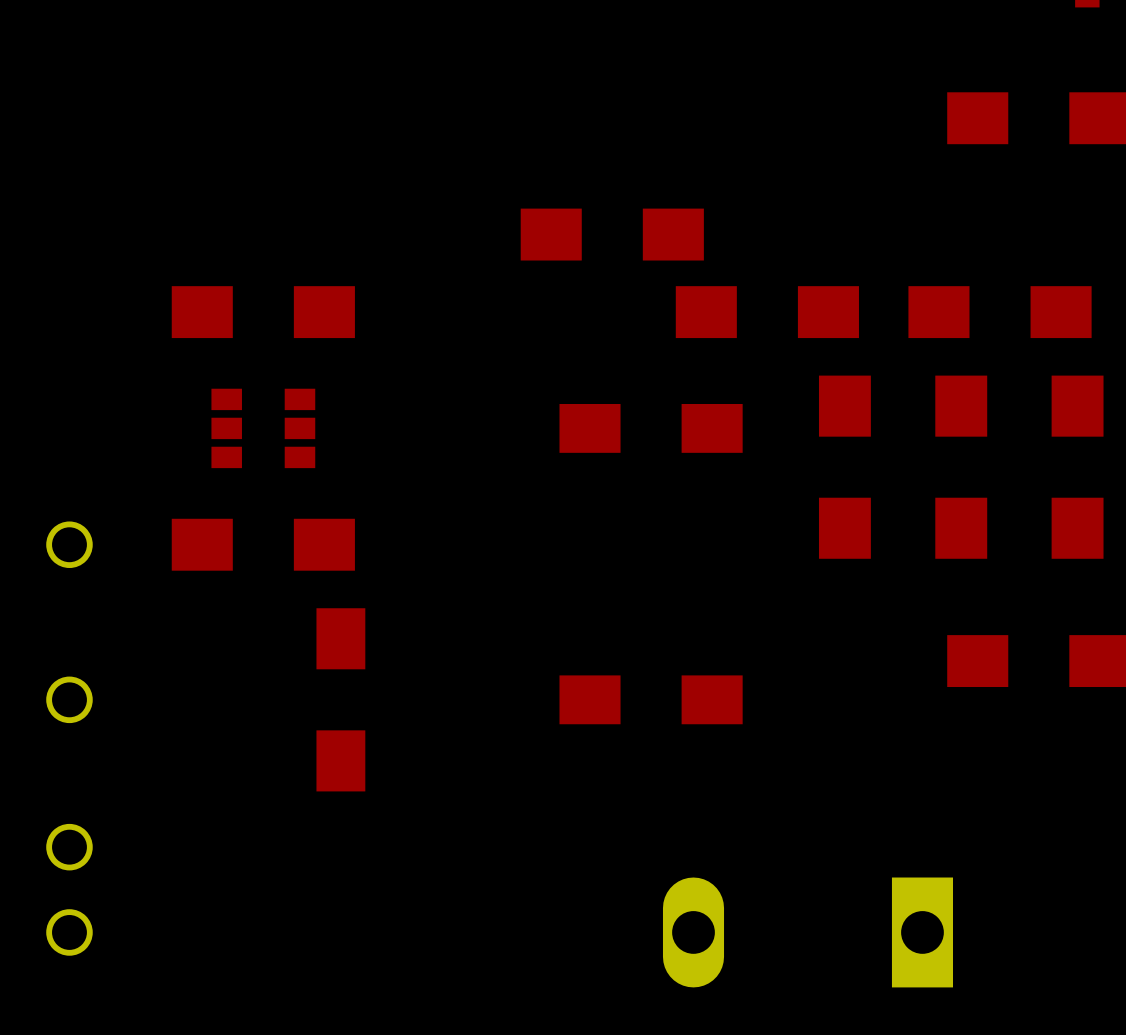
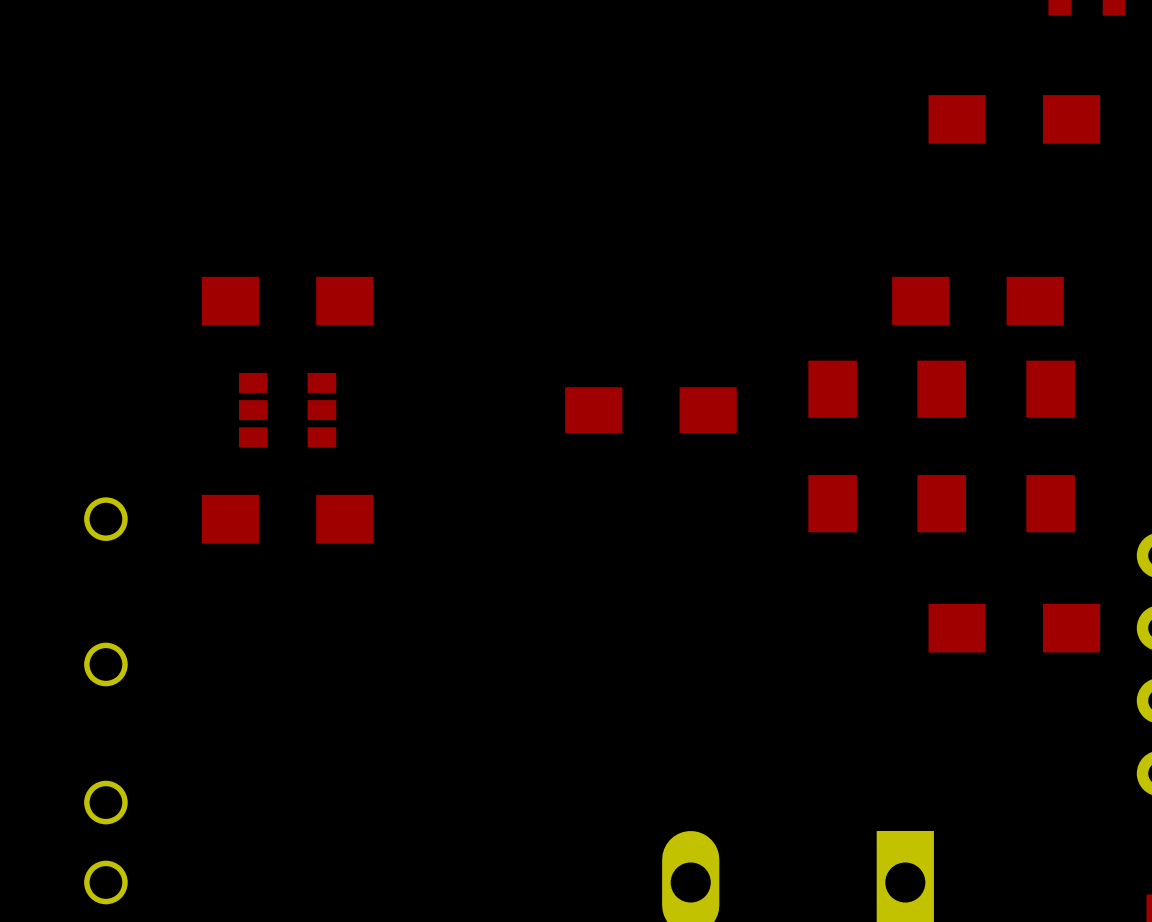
part: (612, 234) -> none
part: (767, 312) -> none
part: (340, 699) -> none
part: (651, 699) -> none

